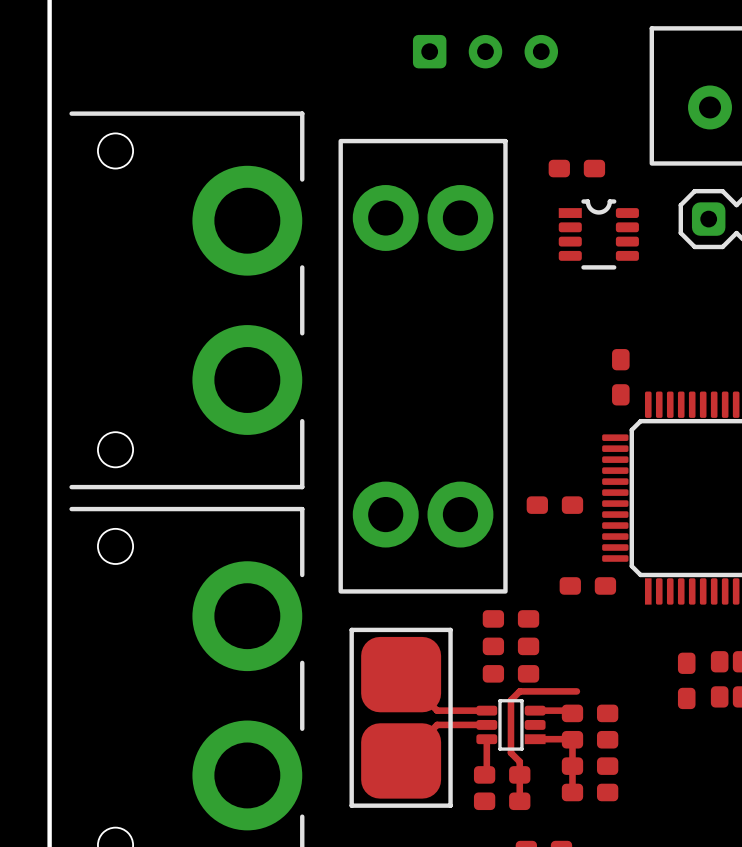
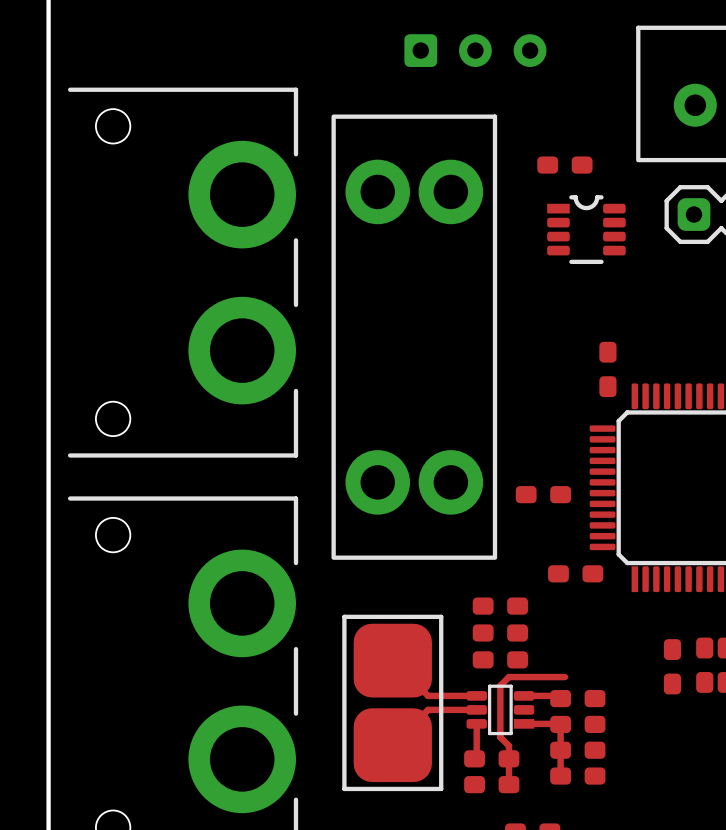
part position: (186, 300) -> (183, 272)
part position: (423, 366) -> (414, 337)

